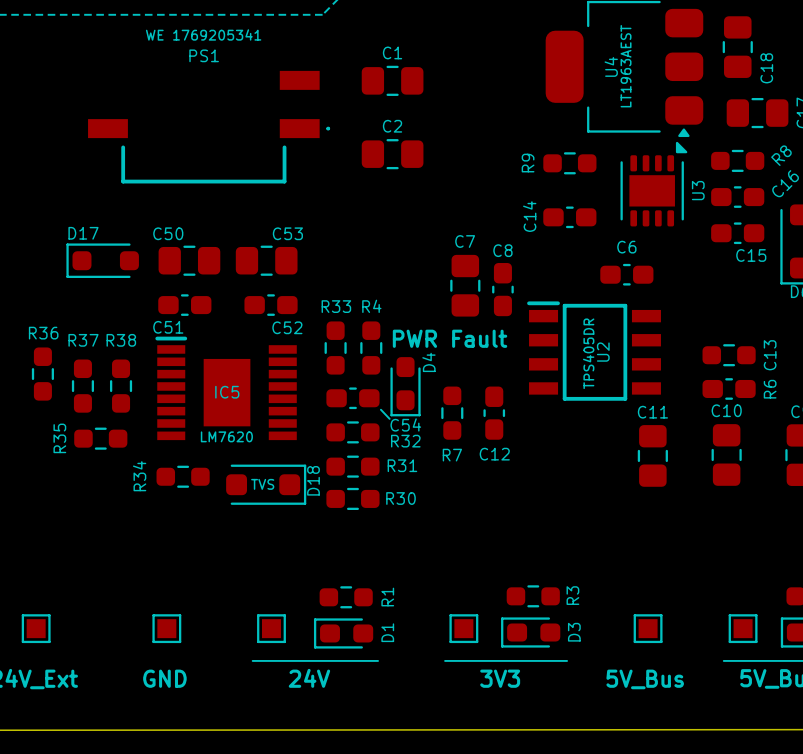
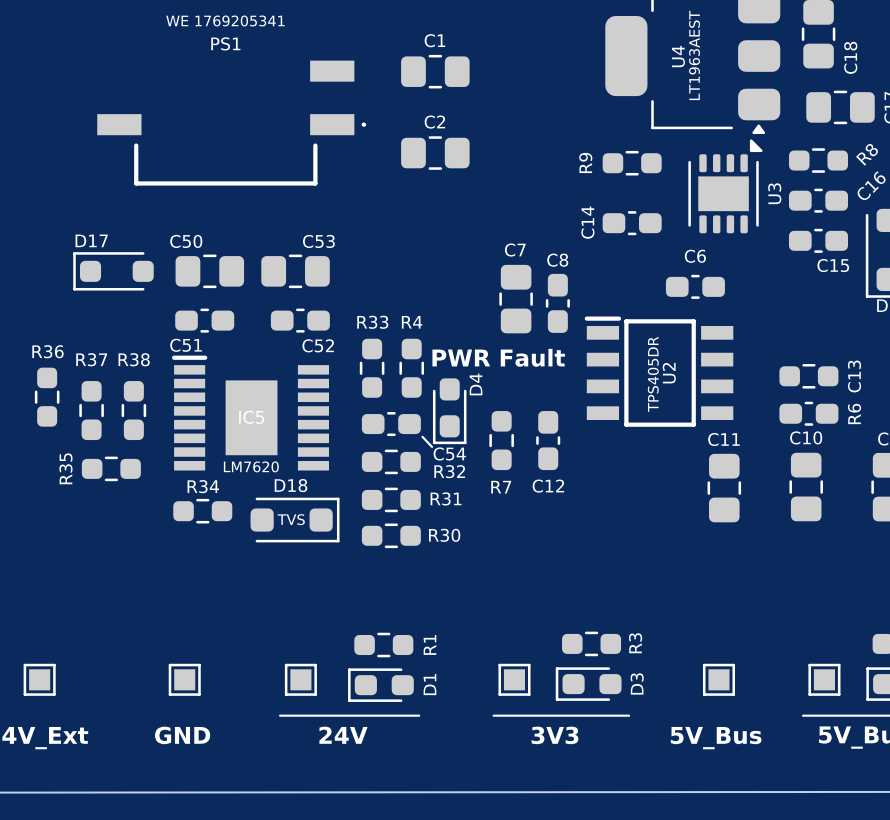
R34 name rotation: 0° (139, 476) -> 90° clockwise (203, 486)
R34 name position: R34 (139, 476) -> R34 (203, 486)
D18 name rotation: 0° (313, 480) -> 90° clockwise (290, 485)
D18 name position: D18 (313, 480) -> D18 (290, 485)

